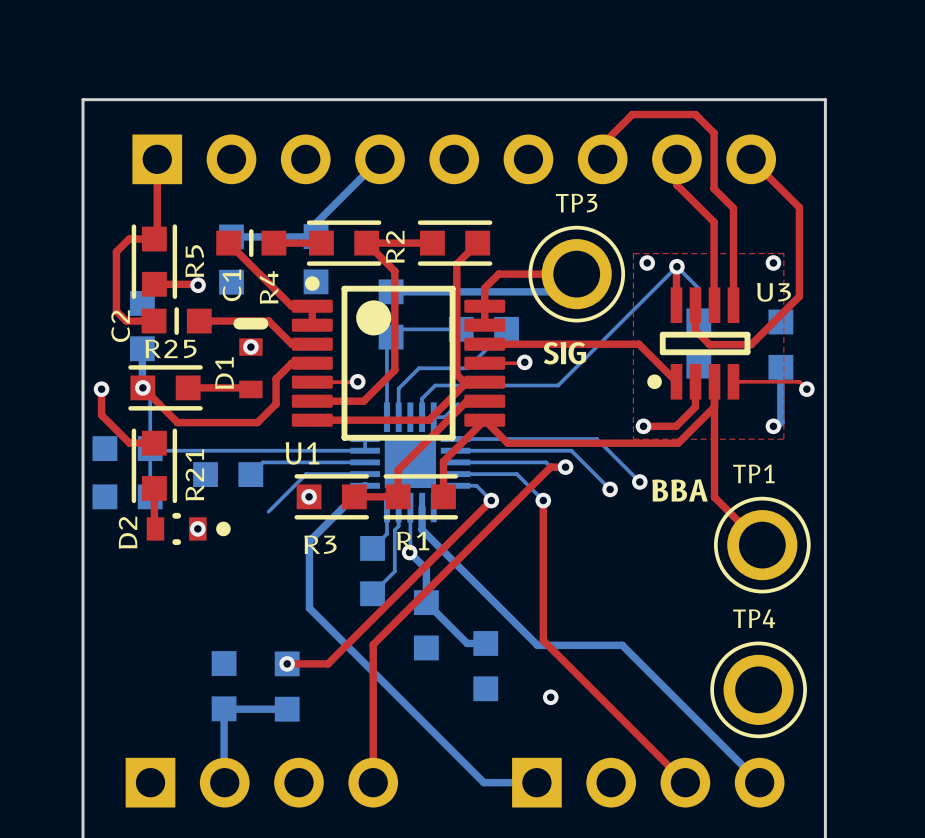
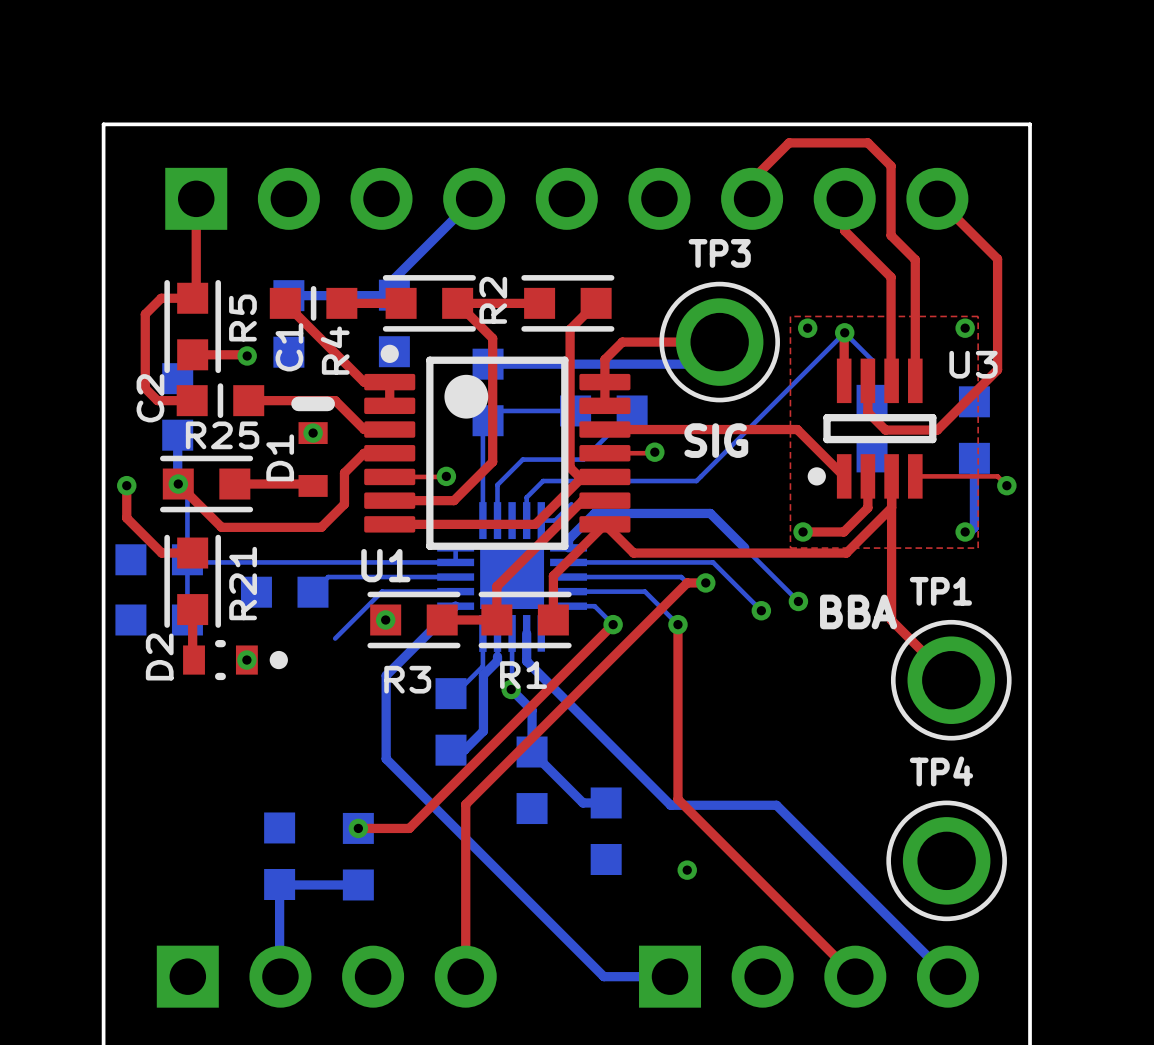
bottom track: (455, 439) (596, 439) -> (568, 547) (568, 539) (594, 513) (710, 513) (744, 547)
bottom track: (398, 526) (394, 530) (394, 571) (372, 593) -> (497, 656) (497, 661) (483, 675) (483, 731) (464, 750) (451, 750)
part position: (372, 571) -> (451, 721)

